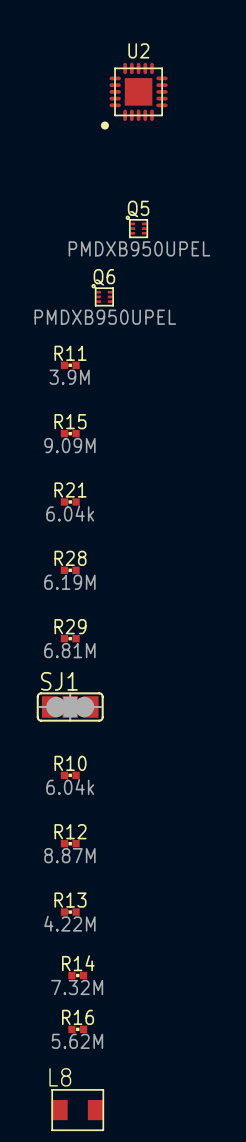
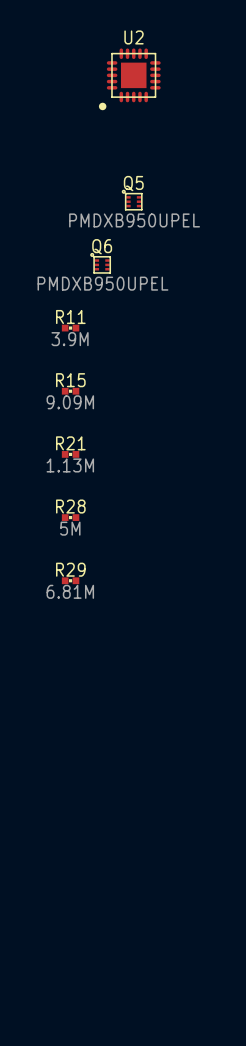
R21 value: 6.04k (70, 513) -> 1.13M (70, 465)
R28 value: 6.19M (69, 582) -> 5M (70, 528)
SJ1: (70, 707) -> none
R10: 6.04k (70, 775) -> none
R12: 8.87M (70, 843) -> none
R13: 4.22M (70, 912) -> none
R14: 7.32M (77, 975) -> none
R16: 5.62M (77, 1029) -> none
L8: (77, 1110) -> none

